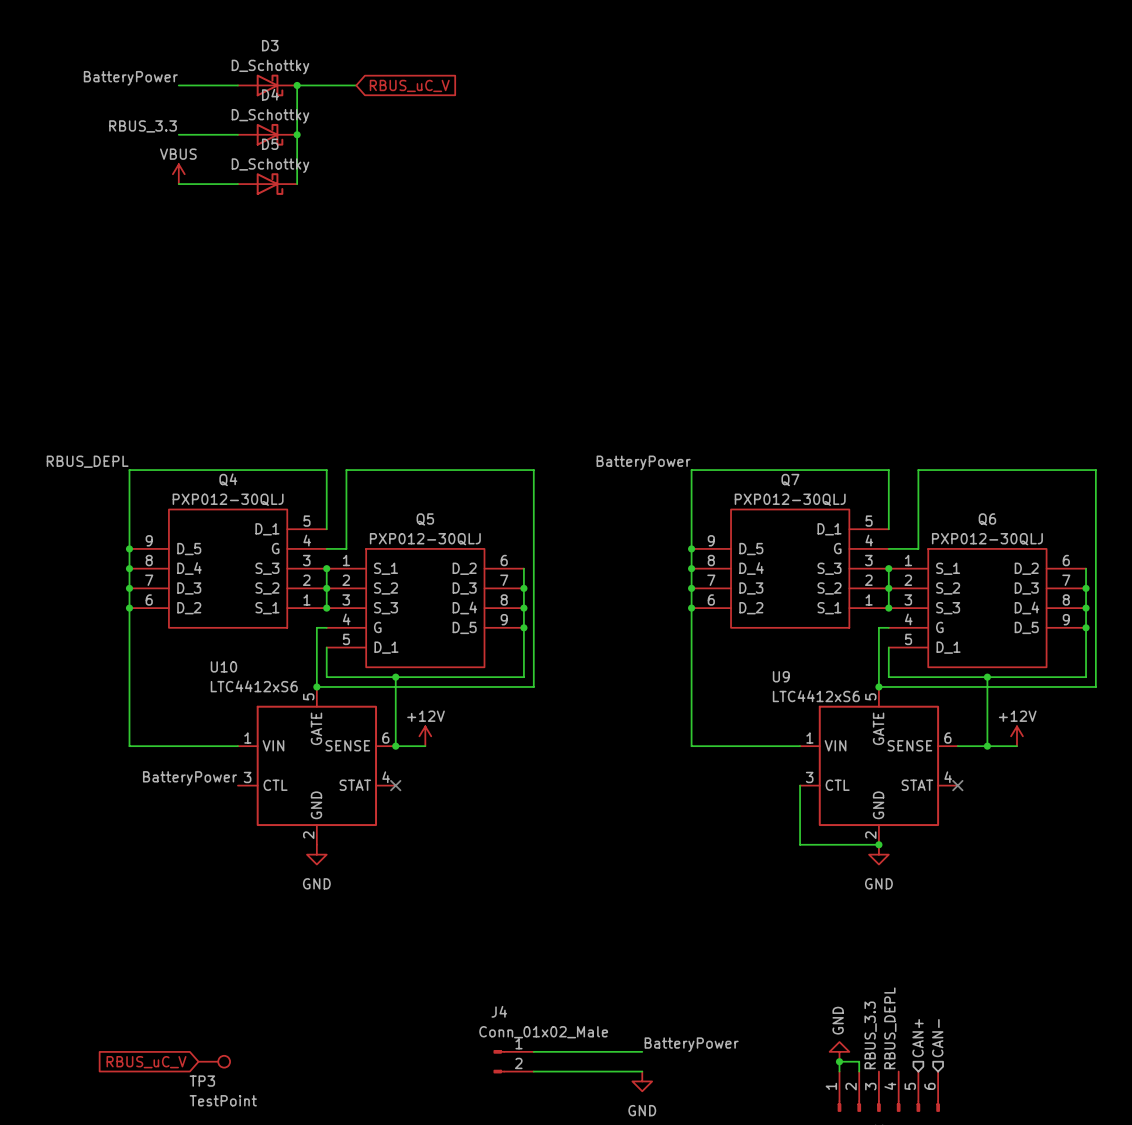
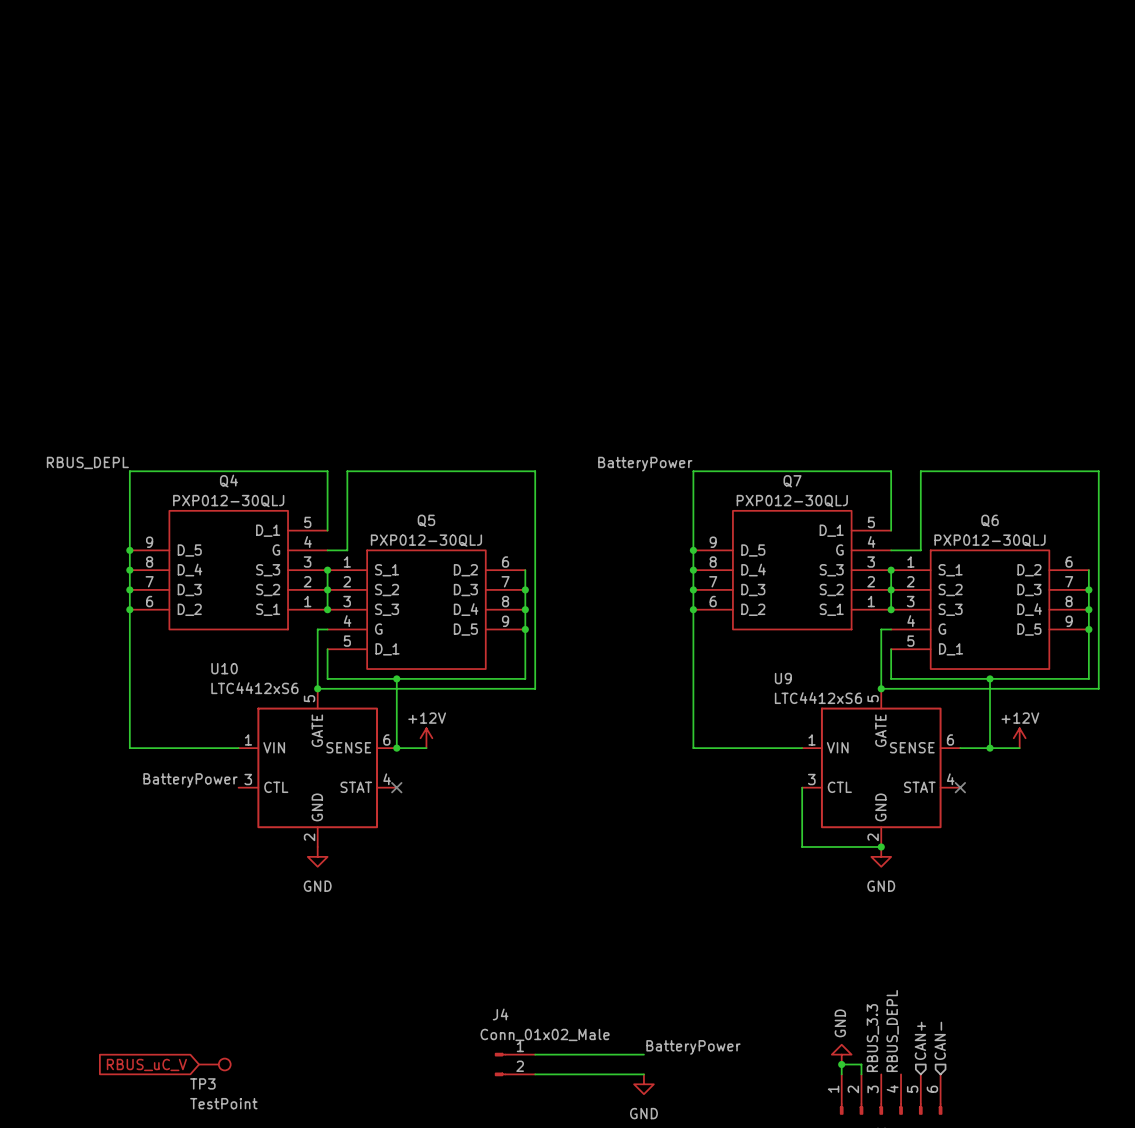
label: BatteryPower (130, 78) -> none
wire: (178, 85) (237, 85) -> none
D3: D_Schottky (267, 85) -> none
junction: (297, 85) -> none
wire: (356, 85) (297, 85) (297, 184) -> none
global label: RBUS_uC_V (409, 85) -> none
label: RBUS_3.3 (143, 126) -> none
wire: (178, 134) (237, 134) -> none
D4: D_Schottky (267, 134) -> none
junction: (297, 134) -> none
power symbol: VBUS (178, 174) -> none
wire: (178, 184) (237, 184) -> none
D5: D_Schottky (267, 184) -> none

